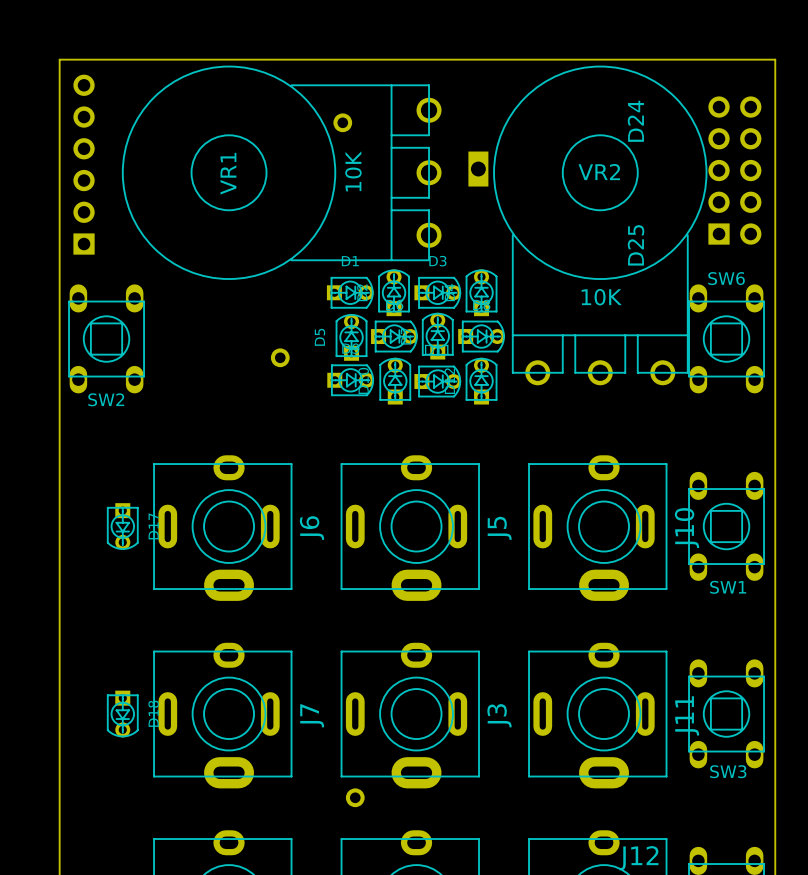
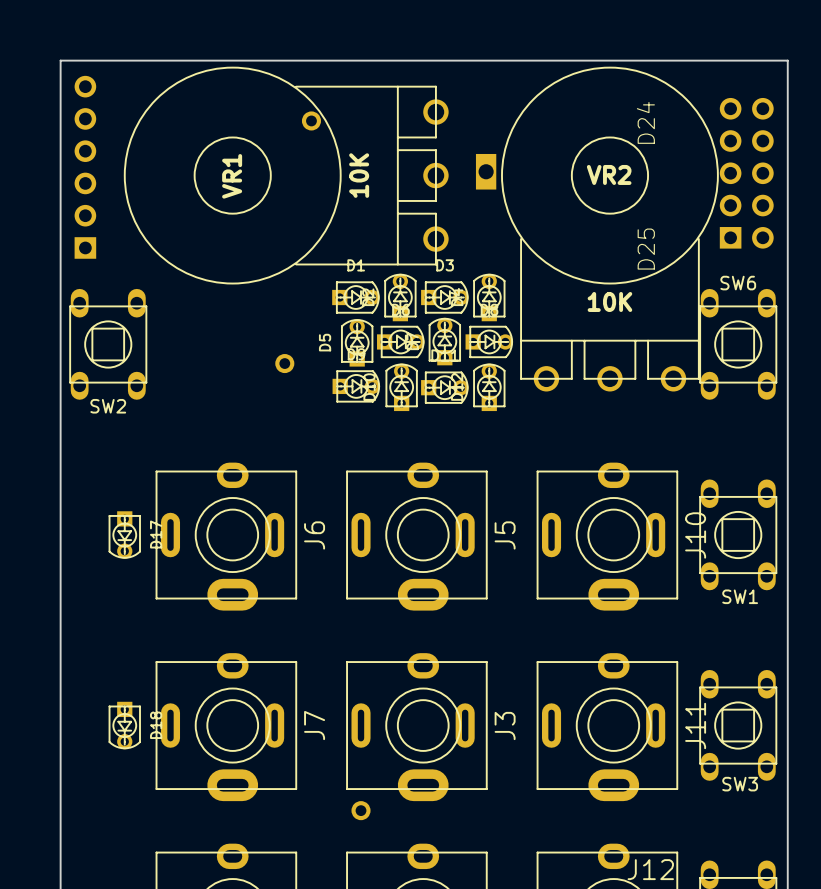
part position: (342, 122) -> (311, 120)

